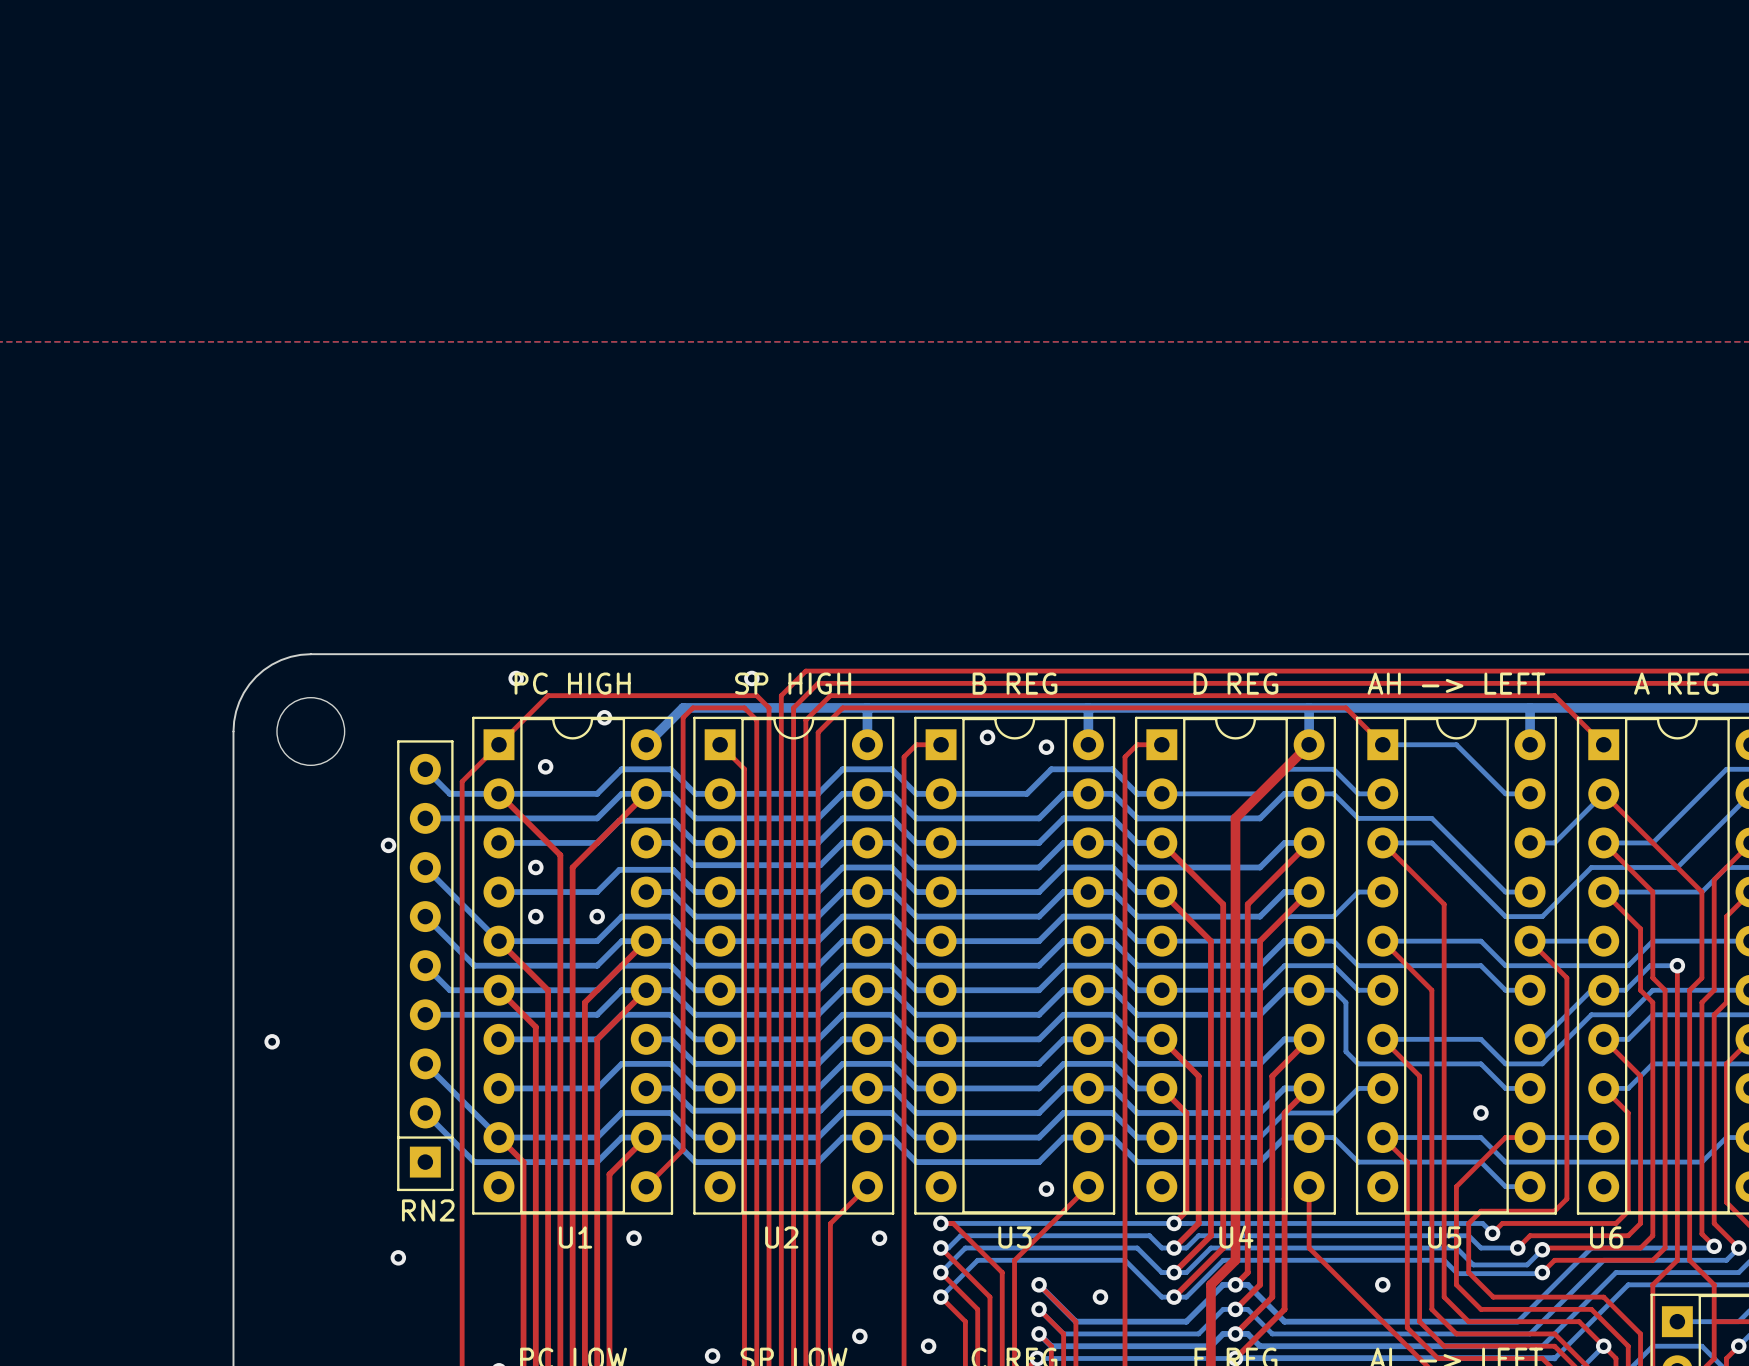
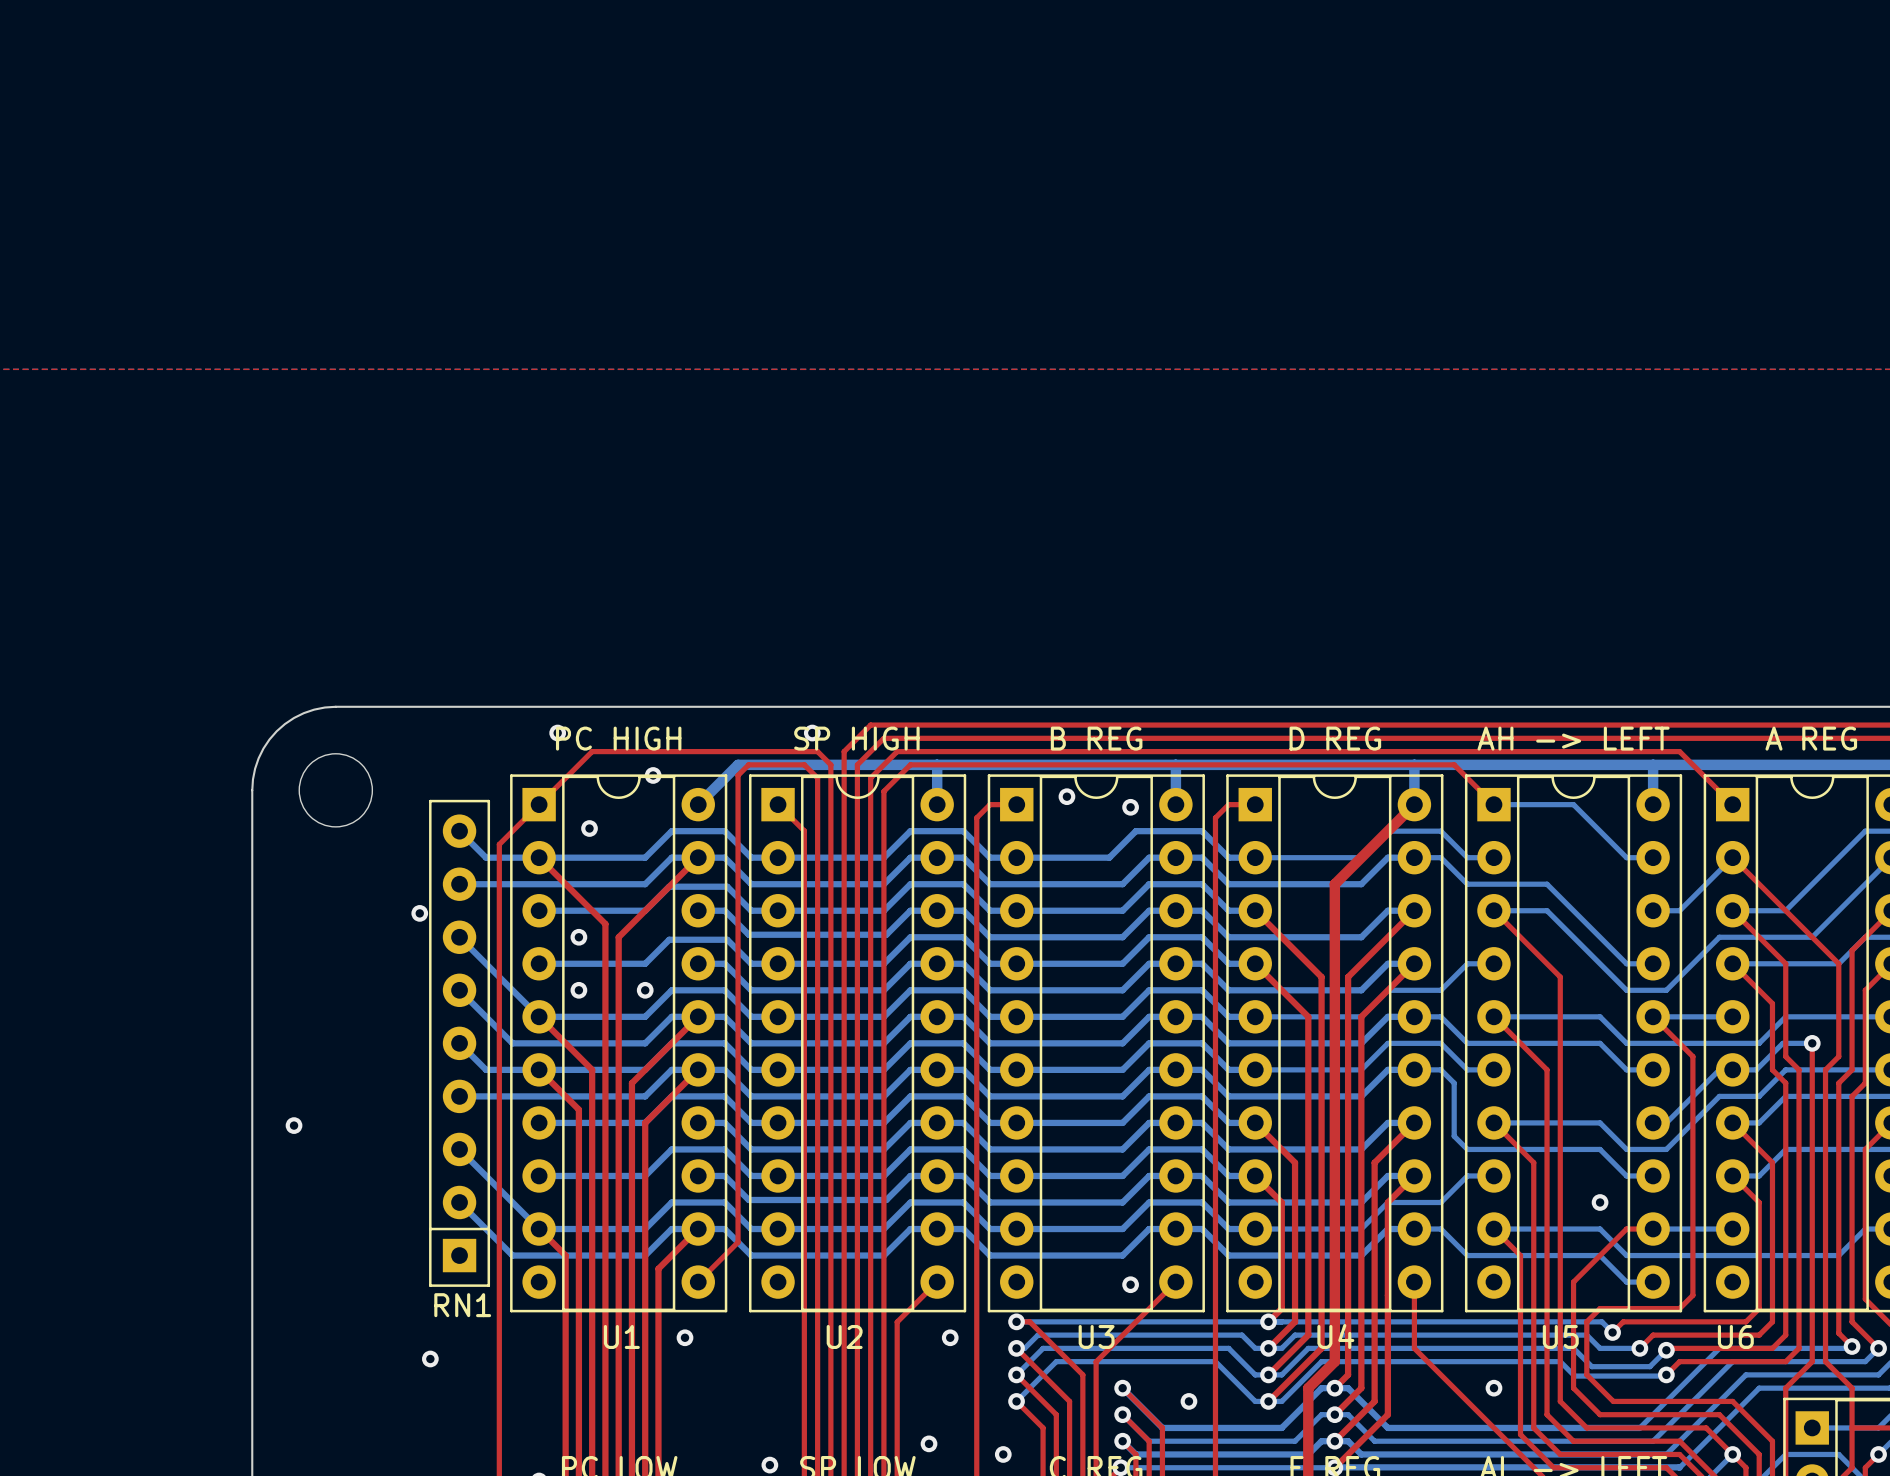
RN2 name: RN2 (428, 1210) -> RN1 (462, 1305)

